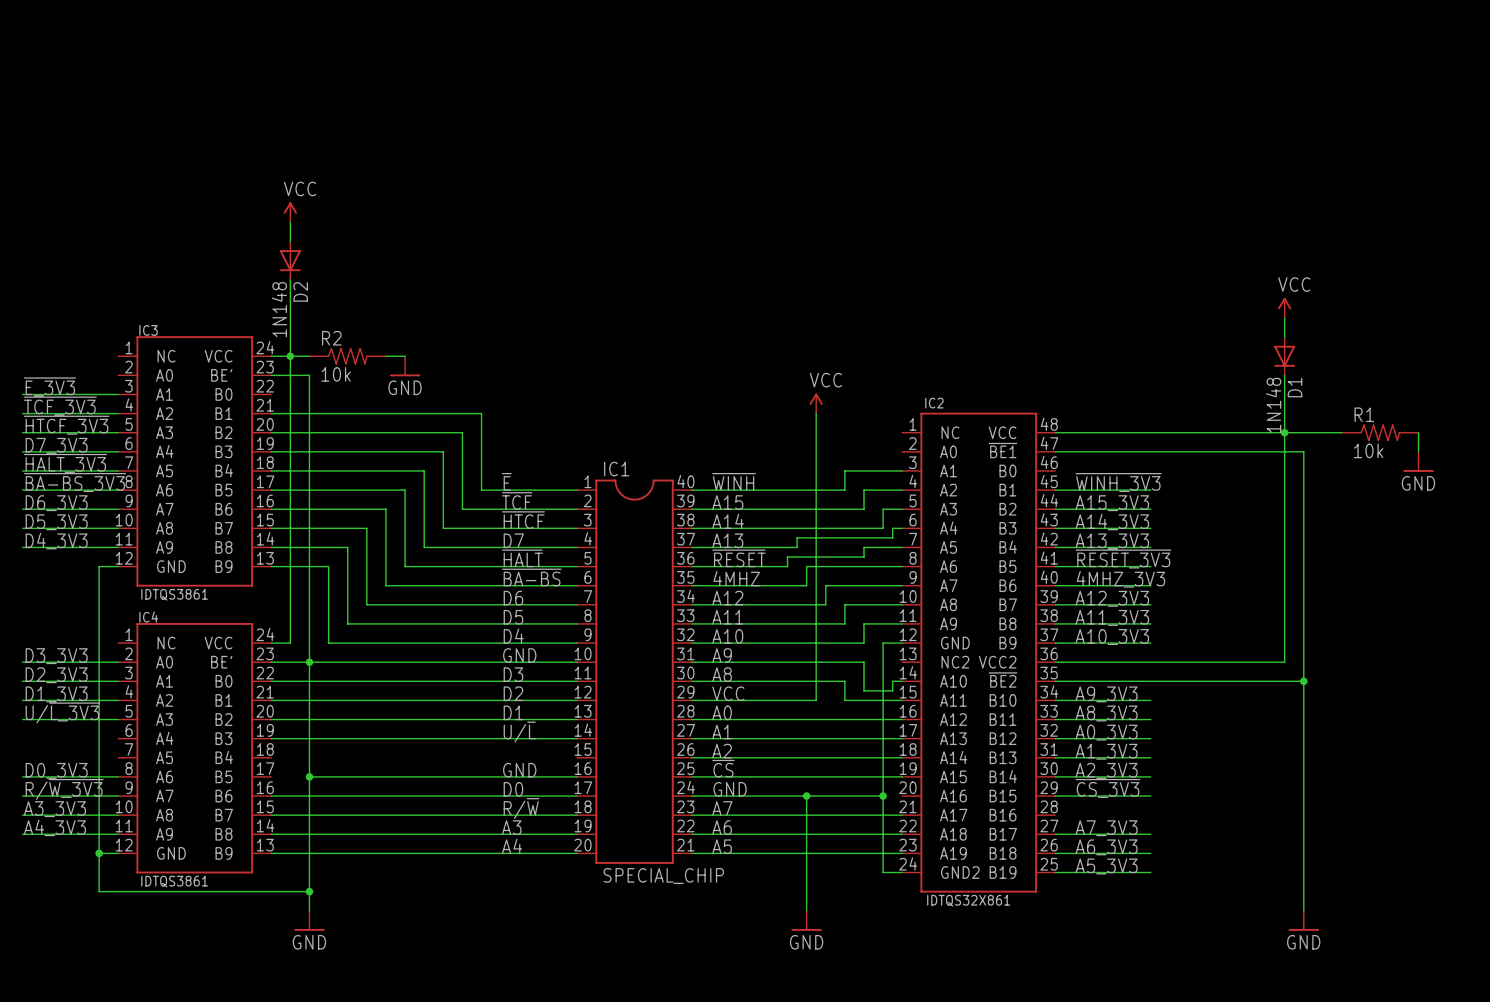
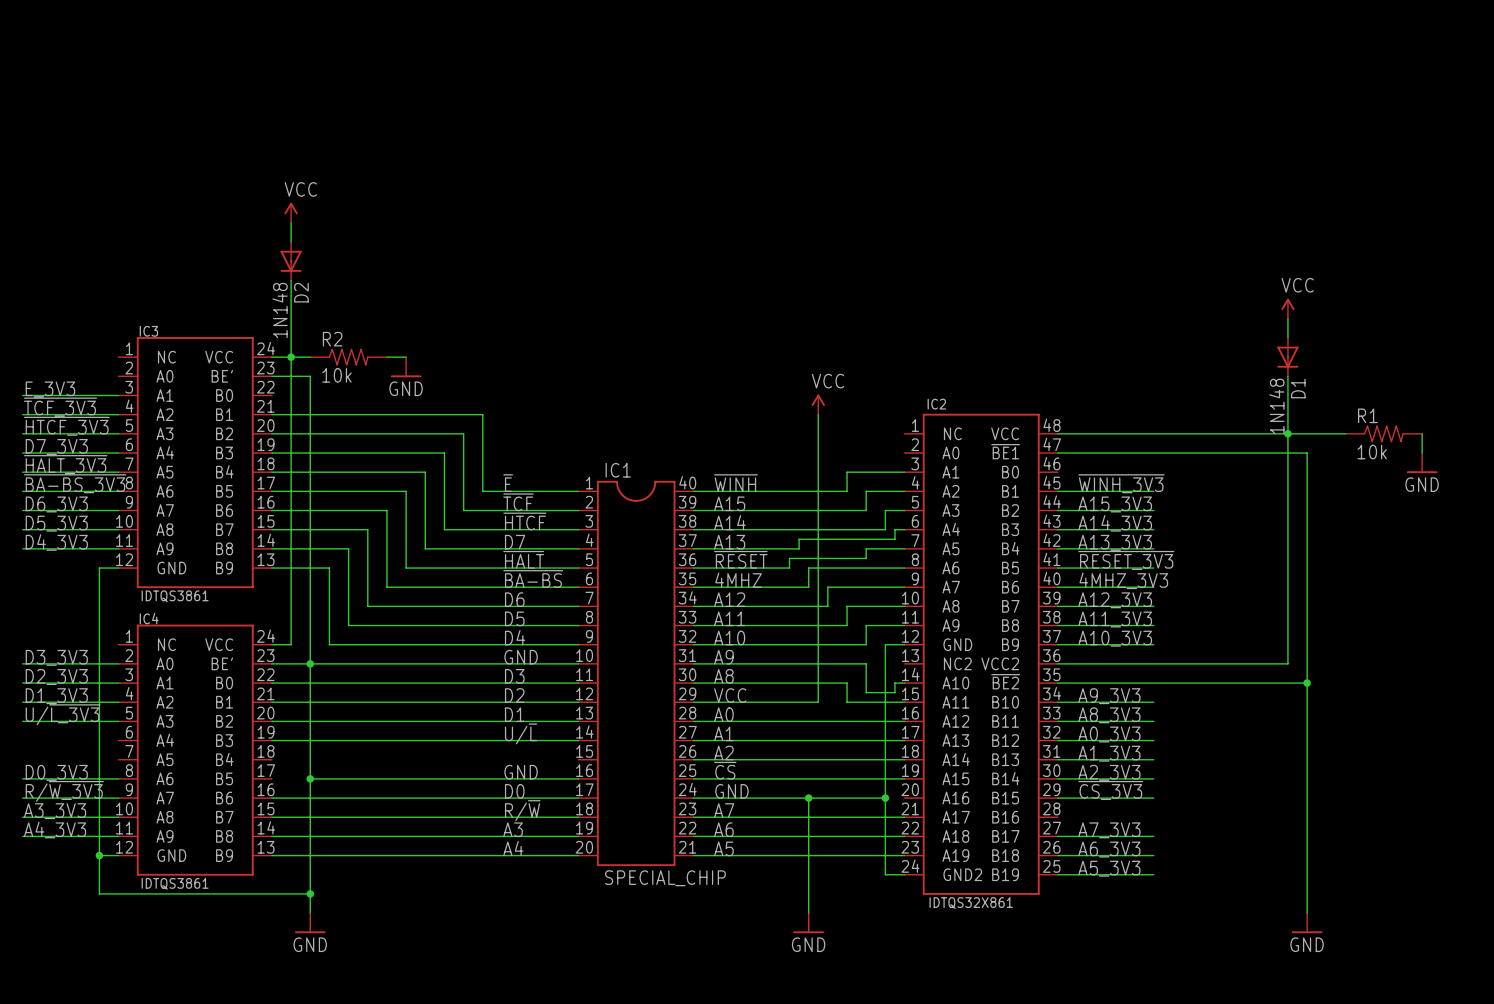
label: ~{E_3V3} (50, 386) -> E_3V3 (50, 389)

